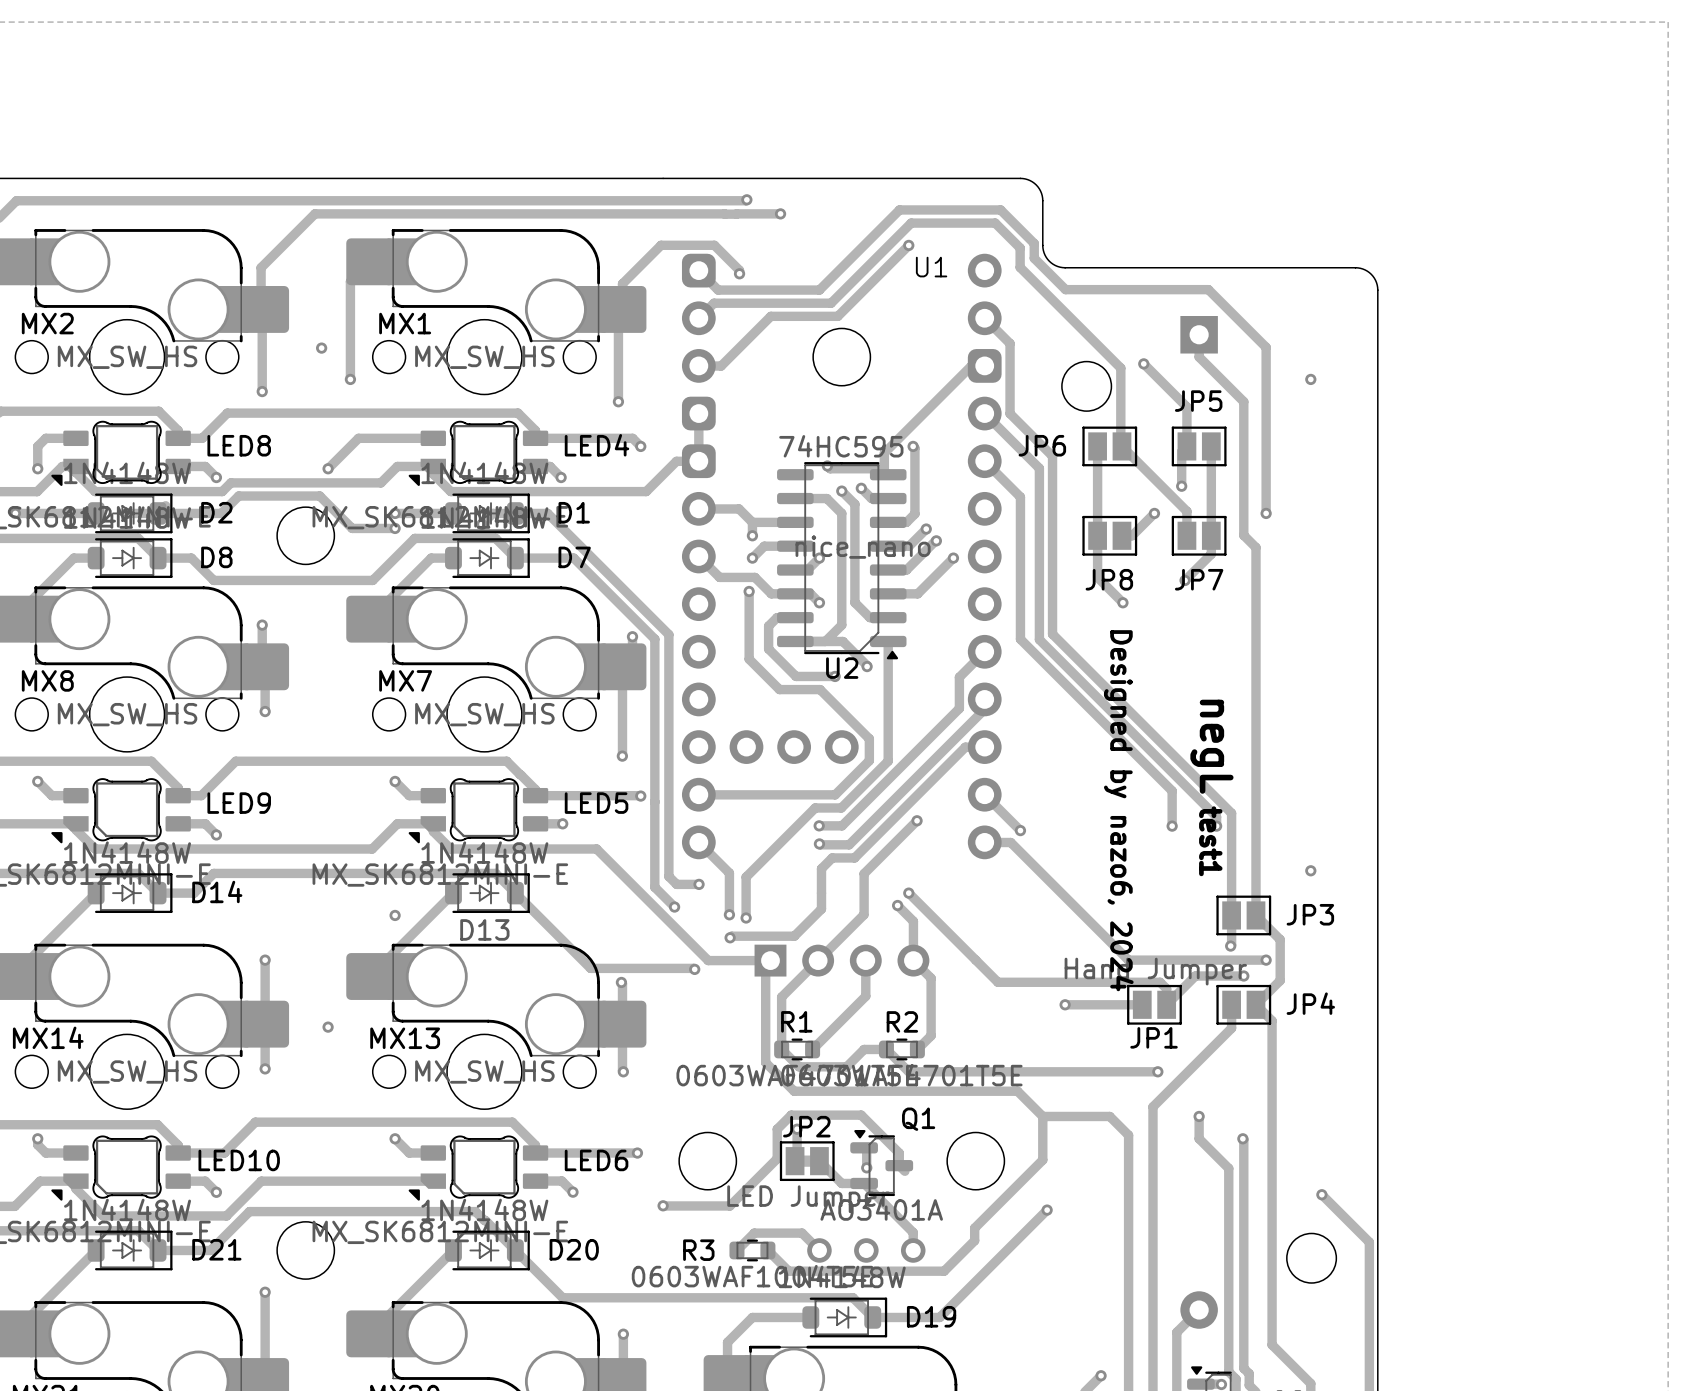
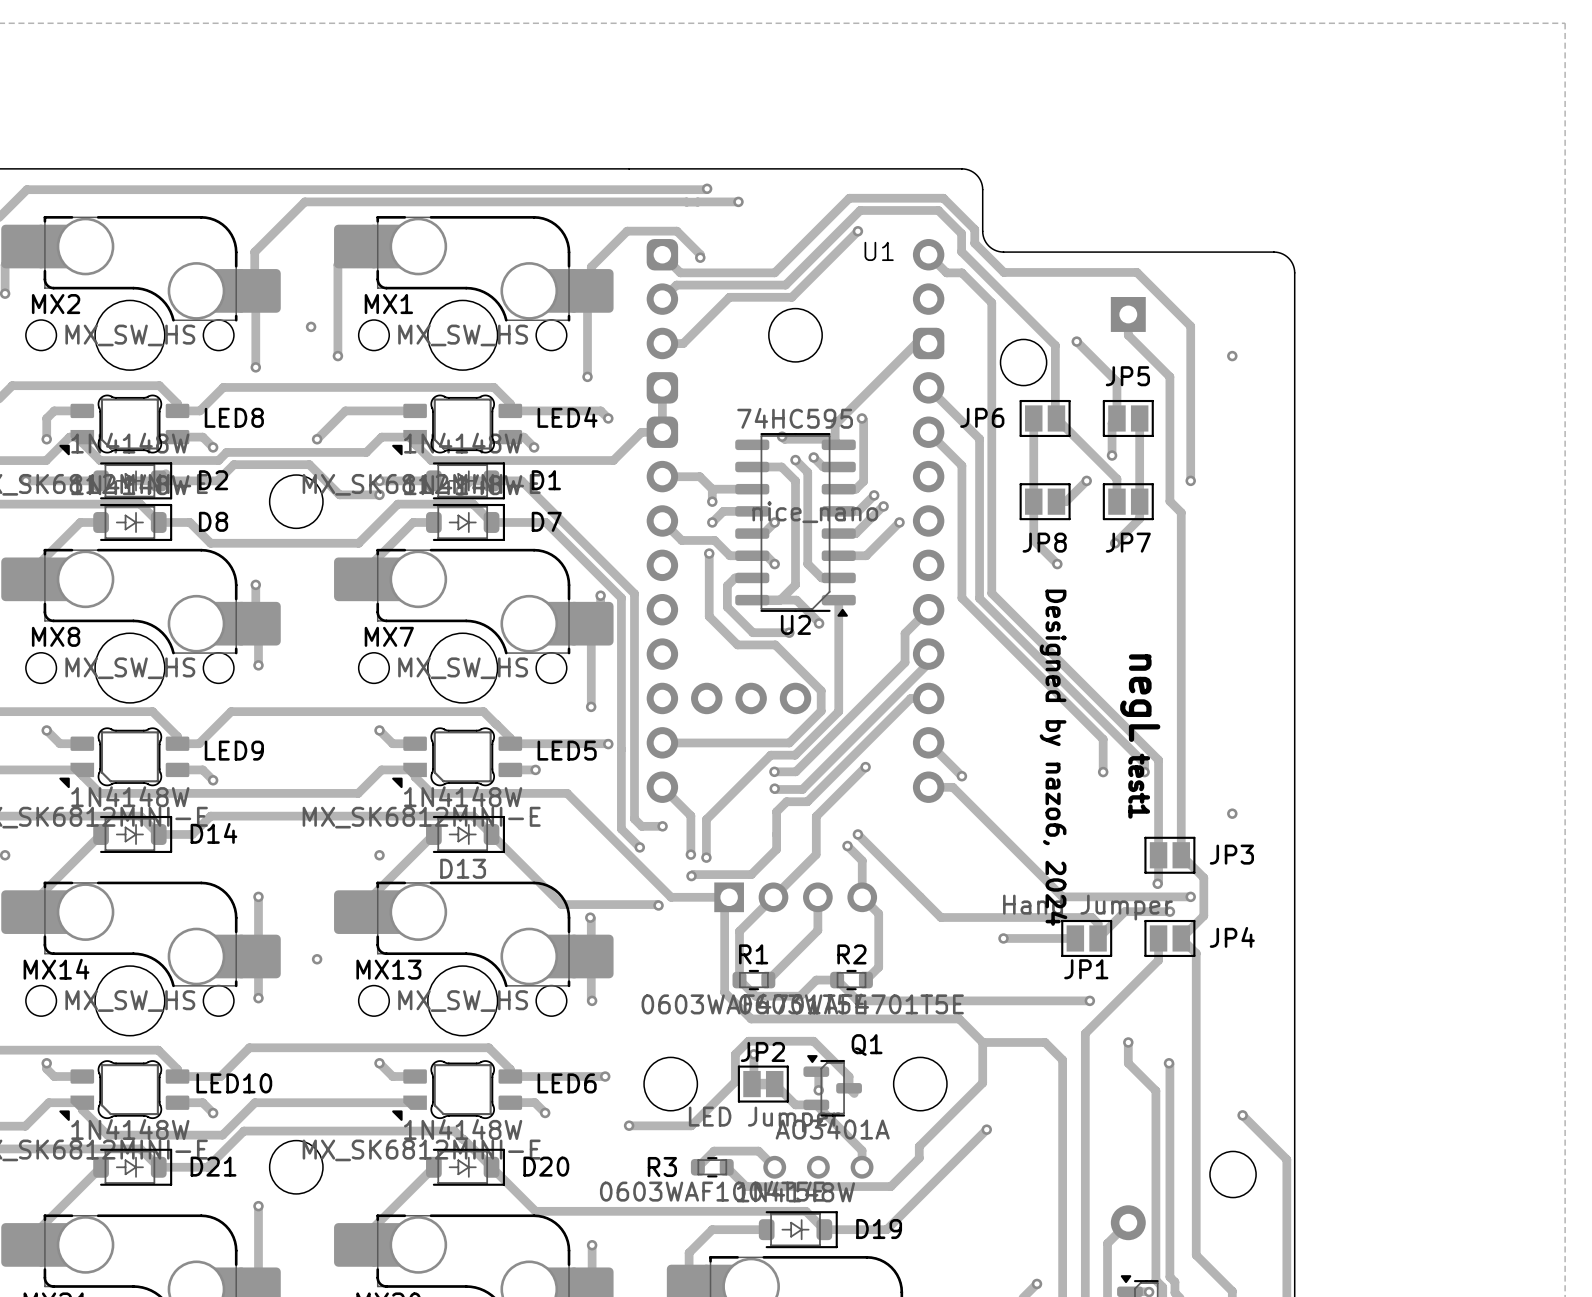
track: (984, 318) (1010, 343) (1010, 413) (1052, 456) -> (928, 254) (946, 272) (961, 272) (991, 302) (991, 427)

